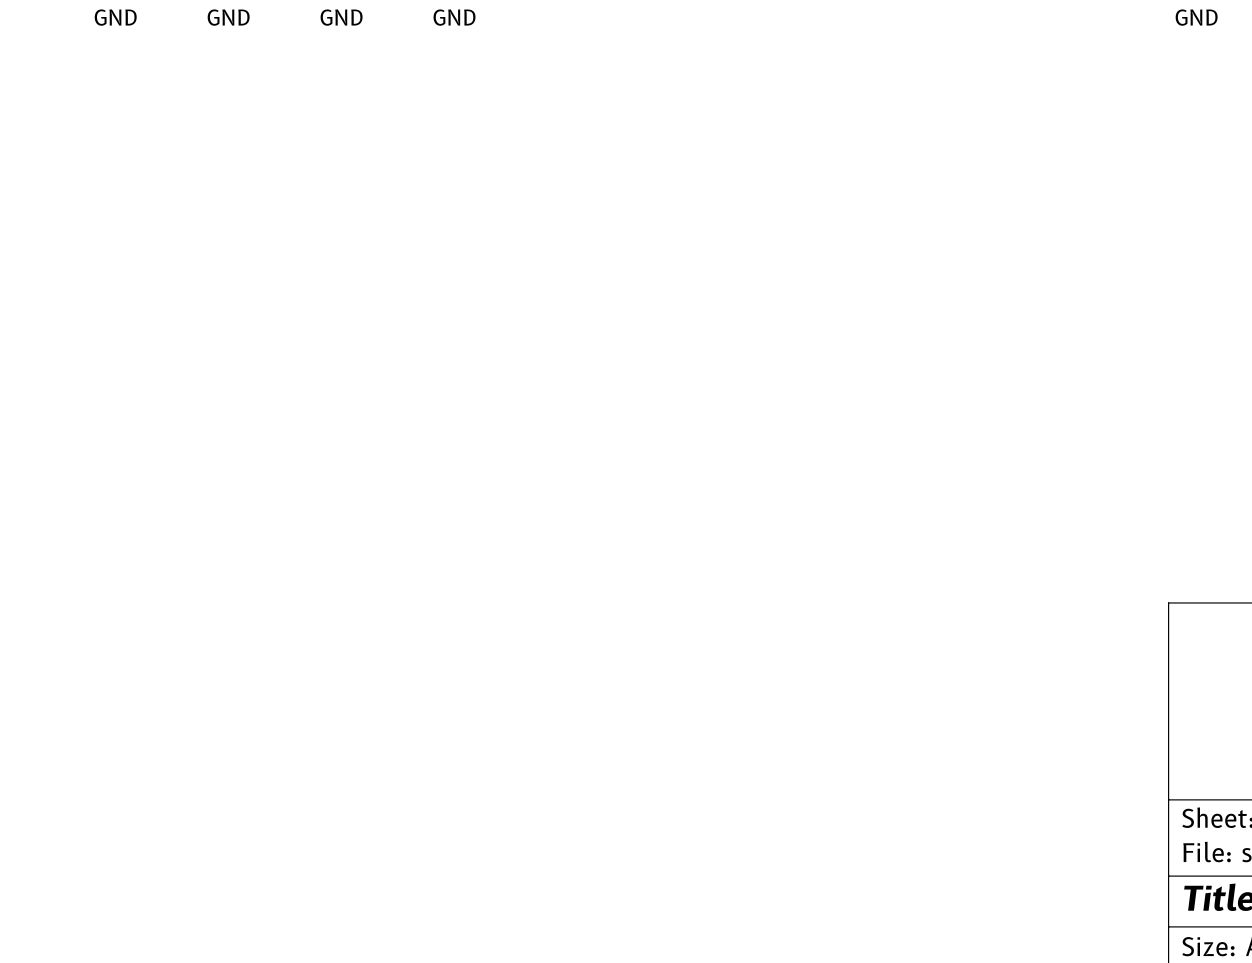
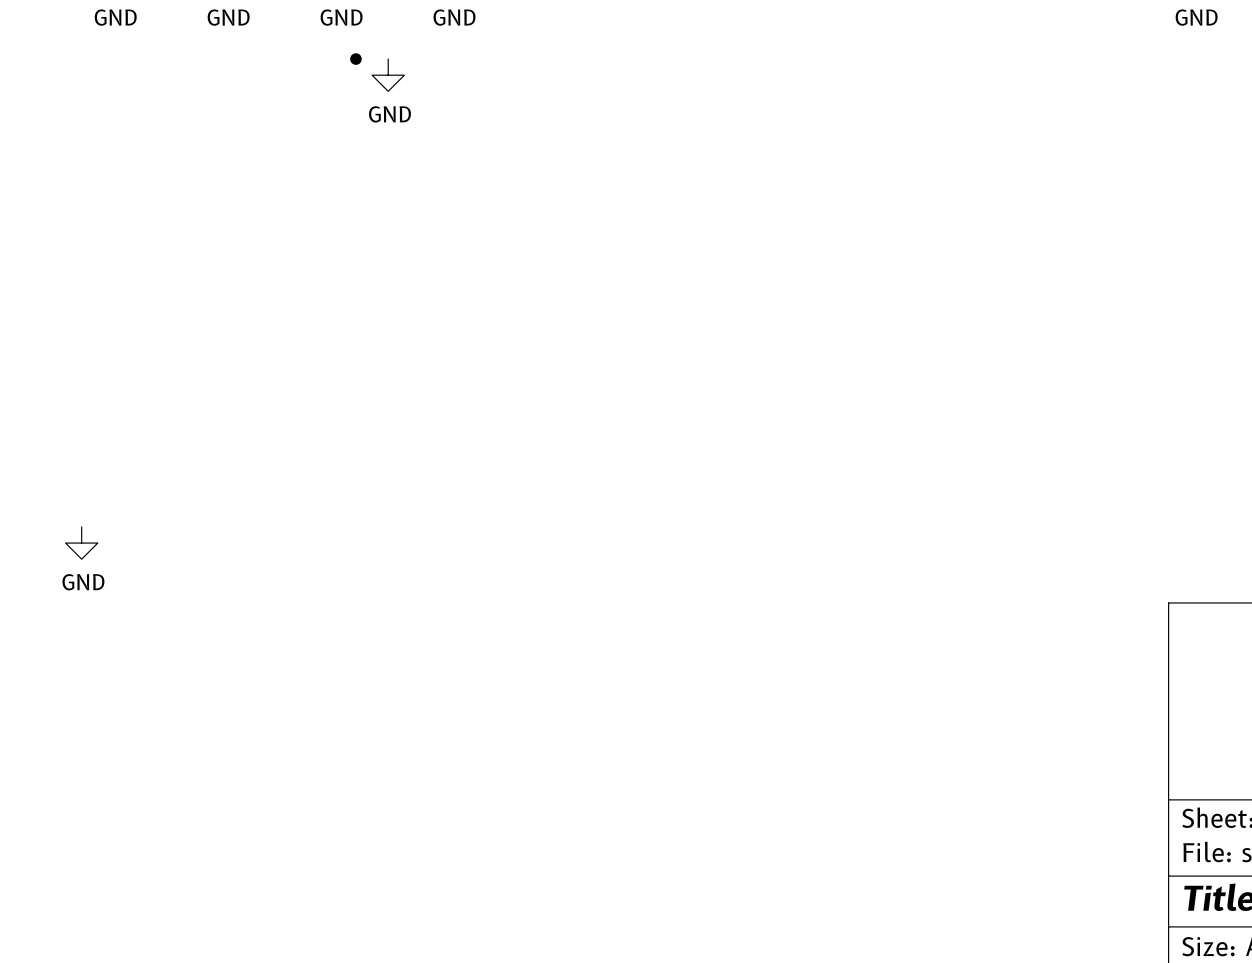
junction: none -> (355, 59)
power symbol: none -> GND (388, 75)
power symbol: none -> GND (81, 543)

